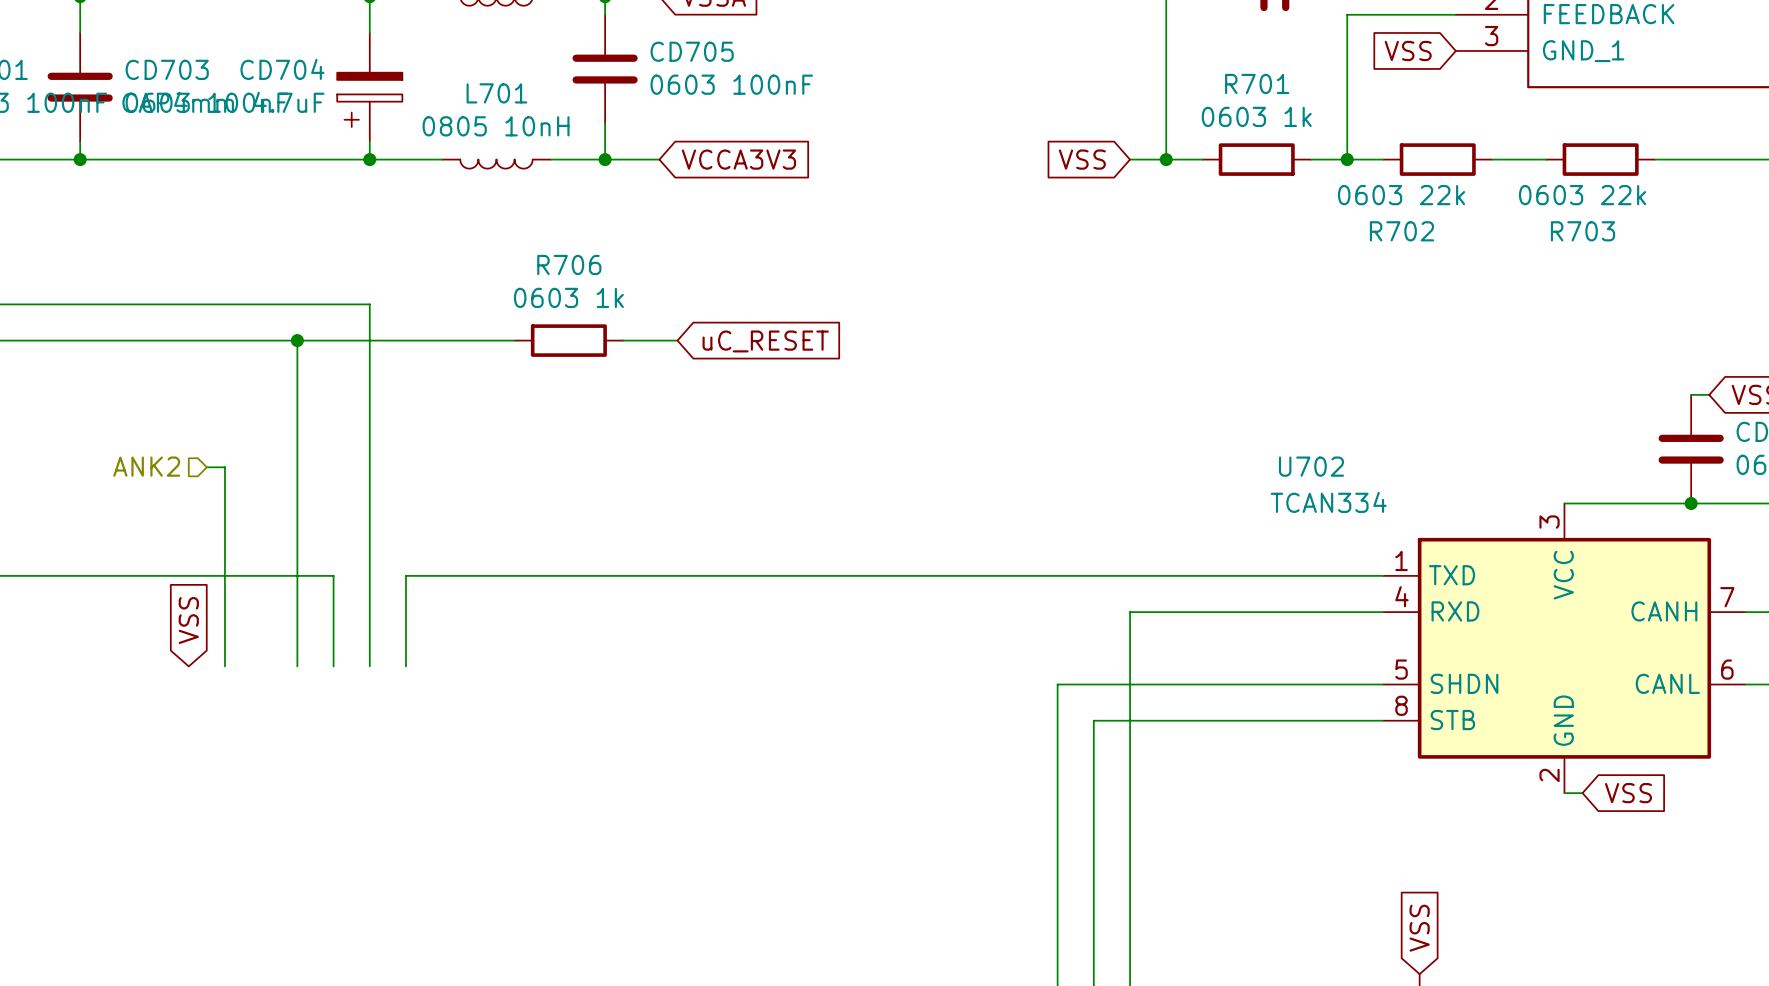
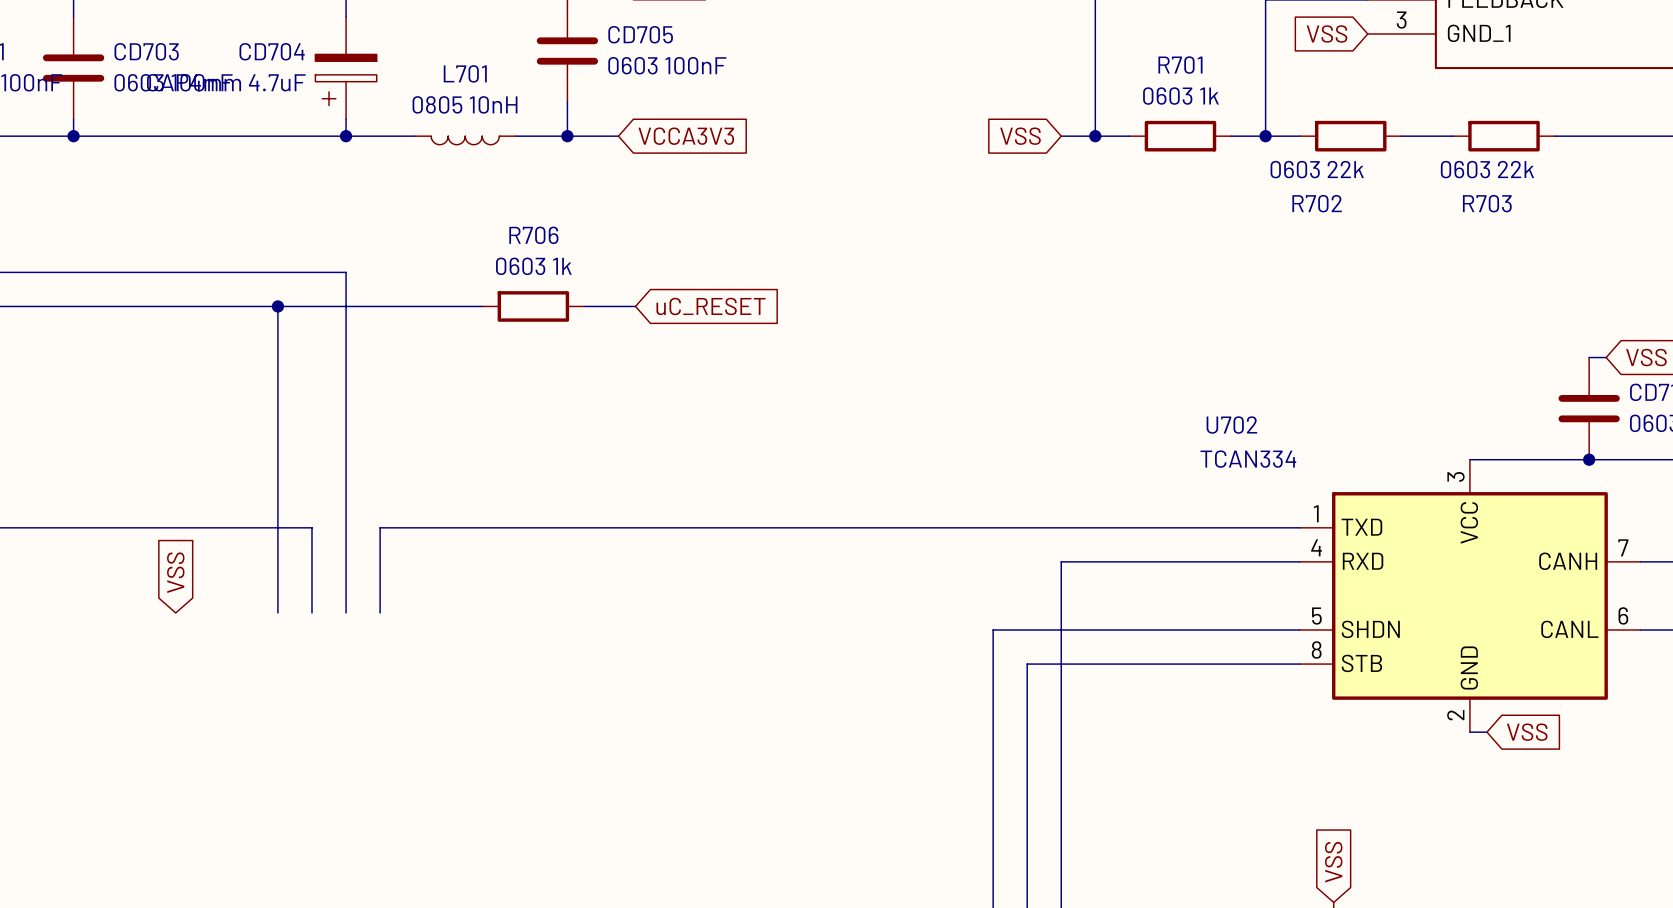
hierarchical label: ANK2 (146, 466) -> none
wire: (206, 467) (224, 467) (224, 666) -> none

